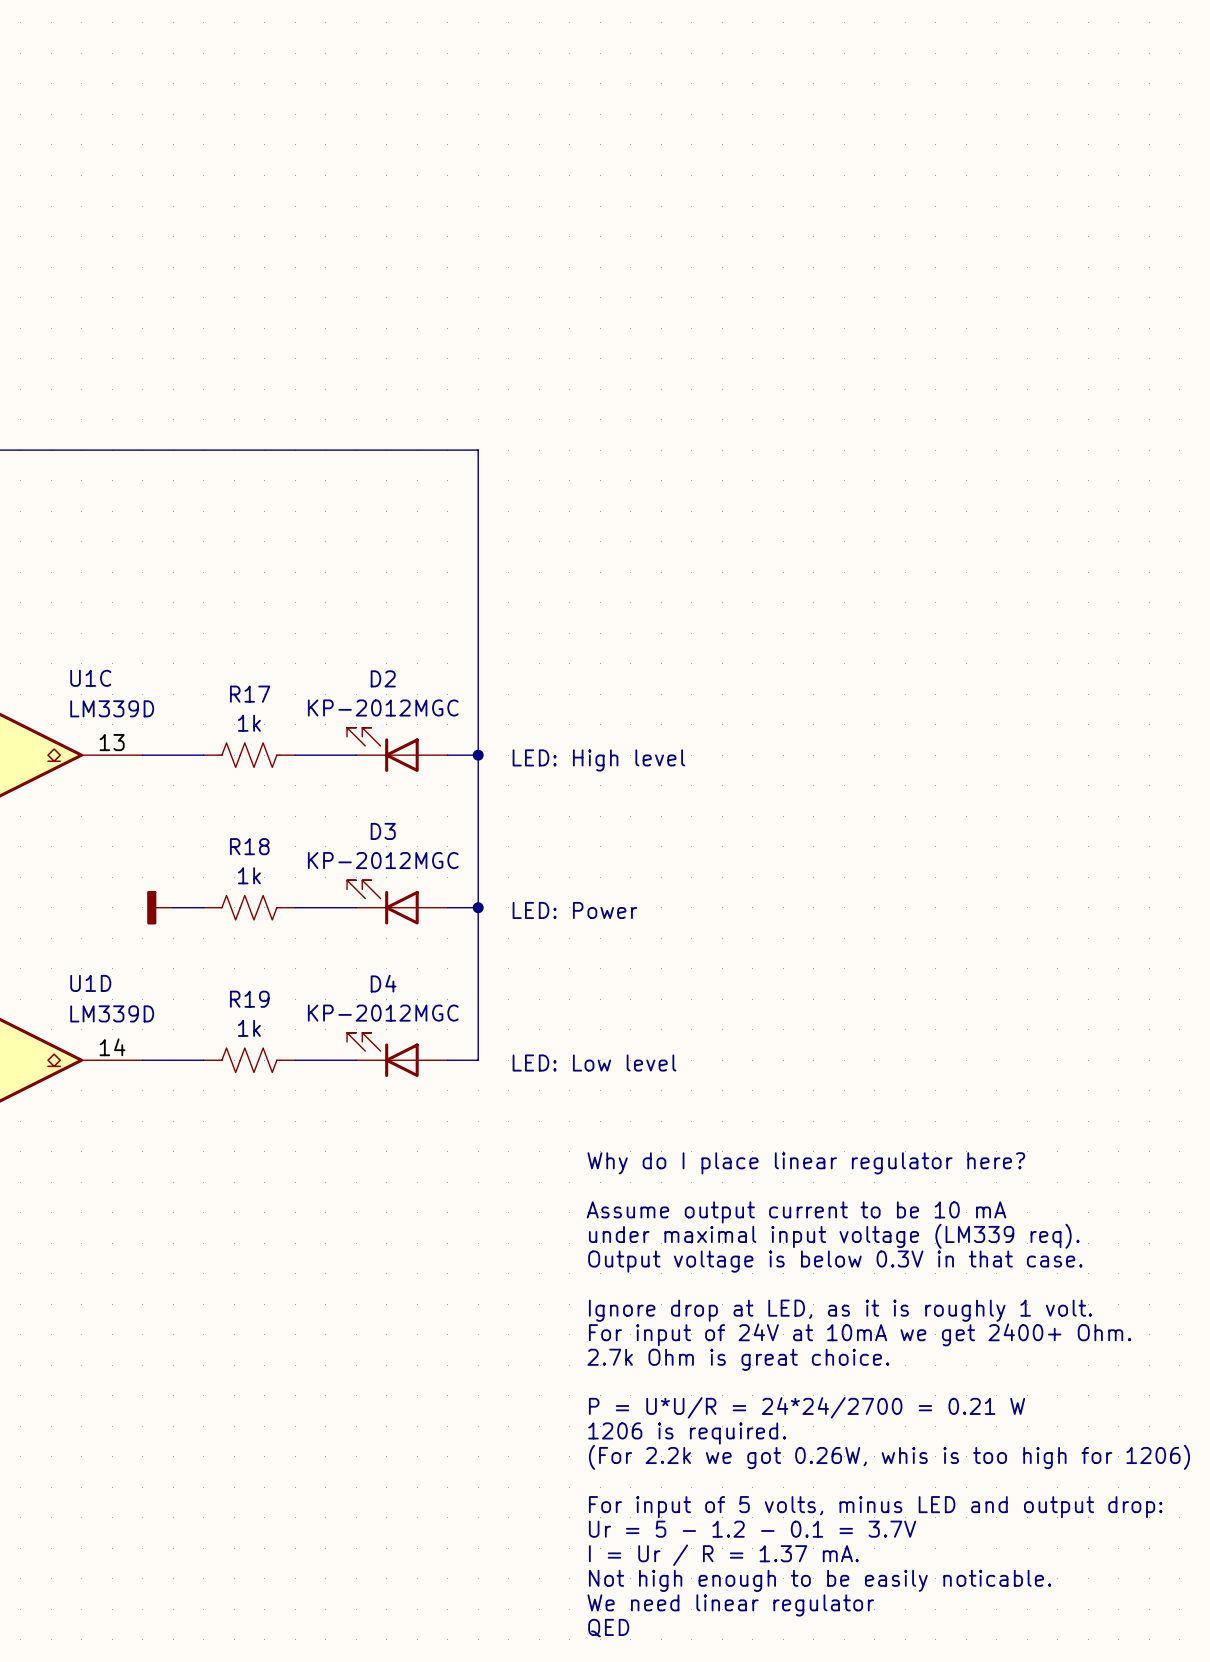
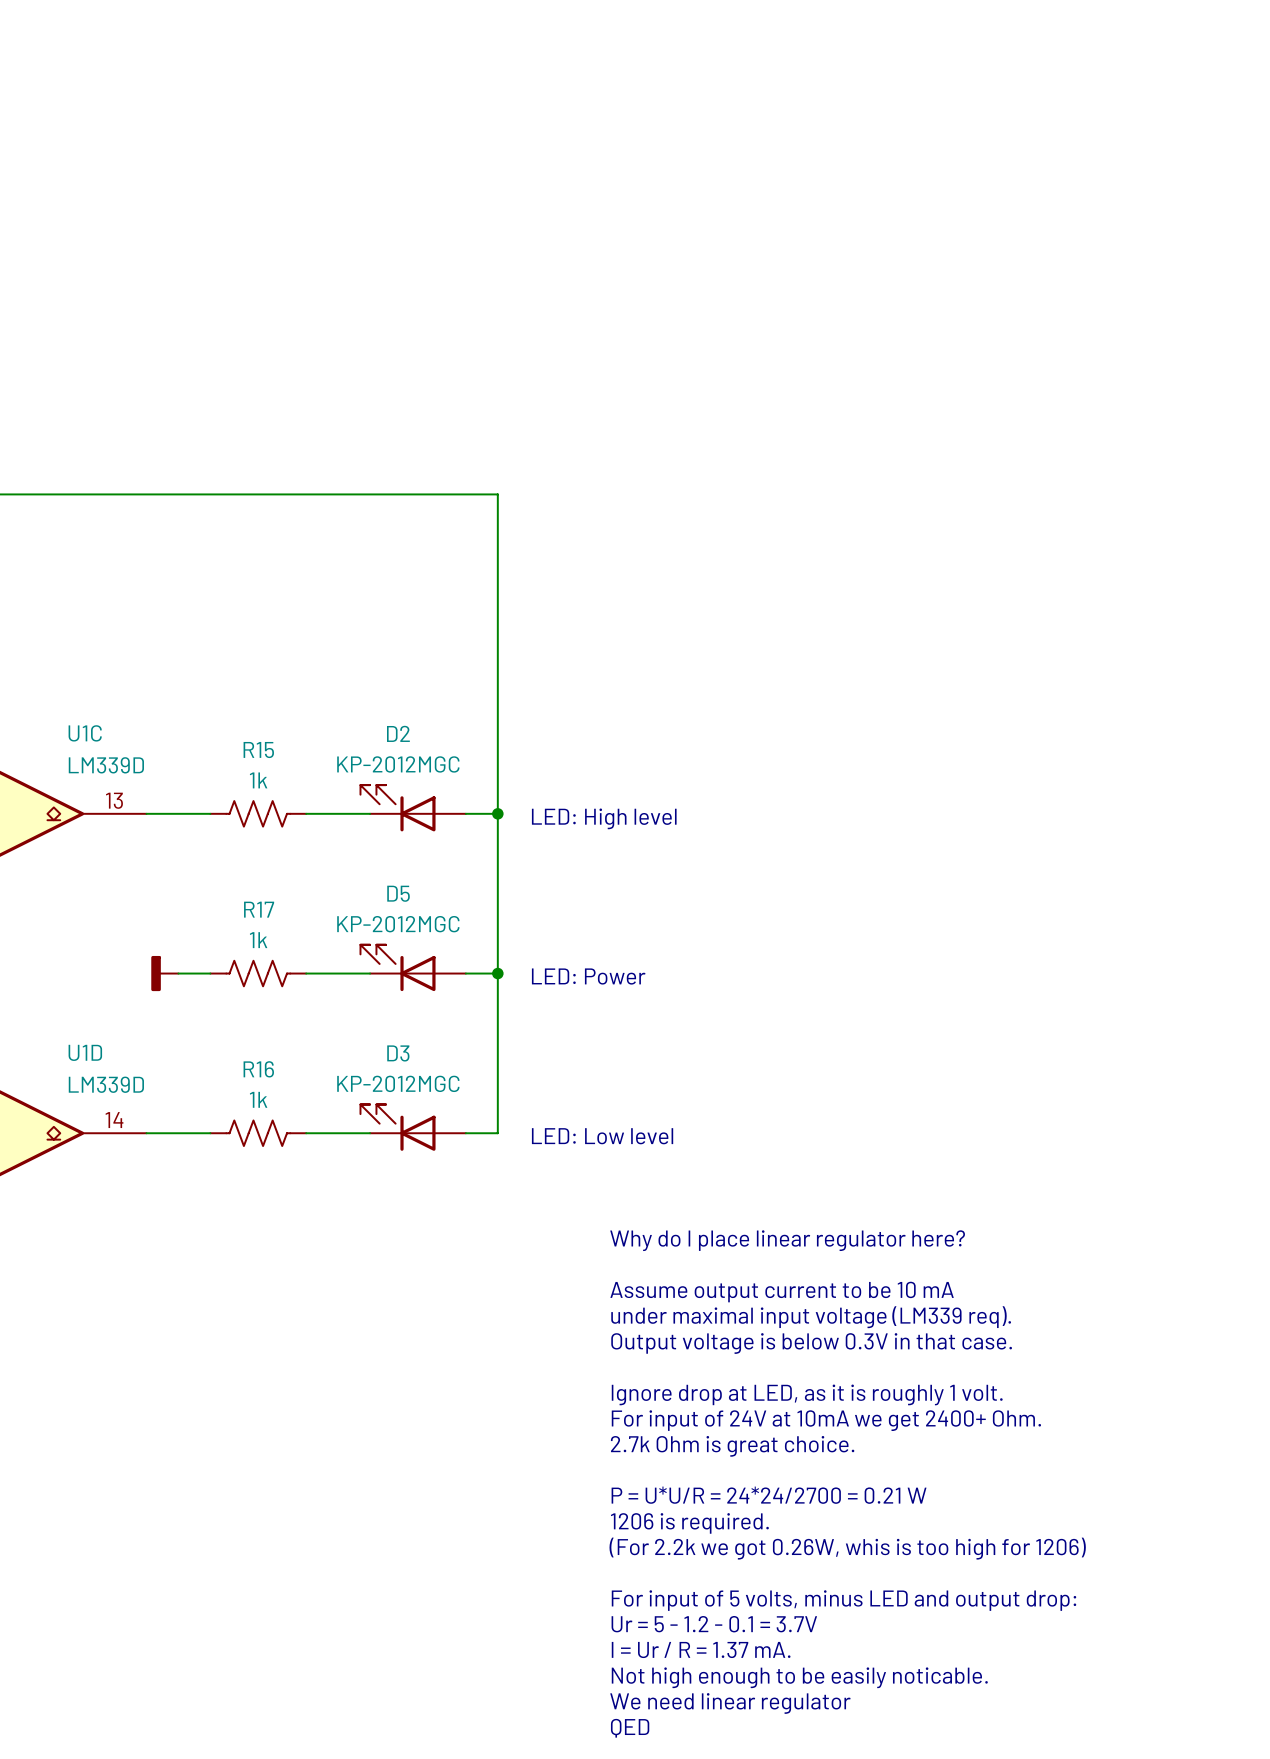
R17 name: R17 (250, 694) -> R15 (258, 750)
D3 name: D3 (383, 831) -> D5 (398, 893)
R18 name: R18 (249, 846) -> R17 (259, 909)
D4 name: D4 (383, 983) -> D3 (398, 1053)
R19 name: R19 (249, 999) -> R16 (258, 1069)

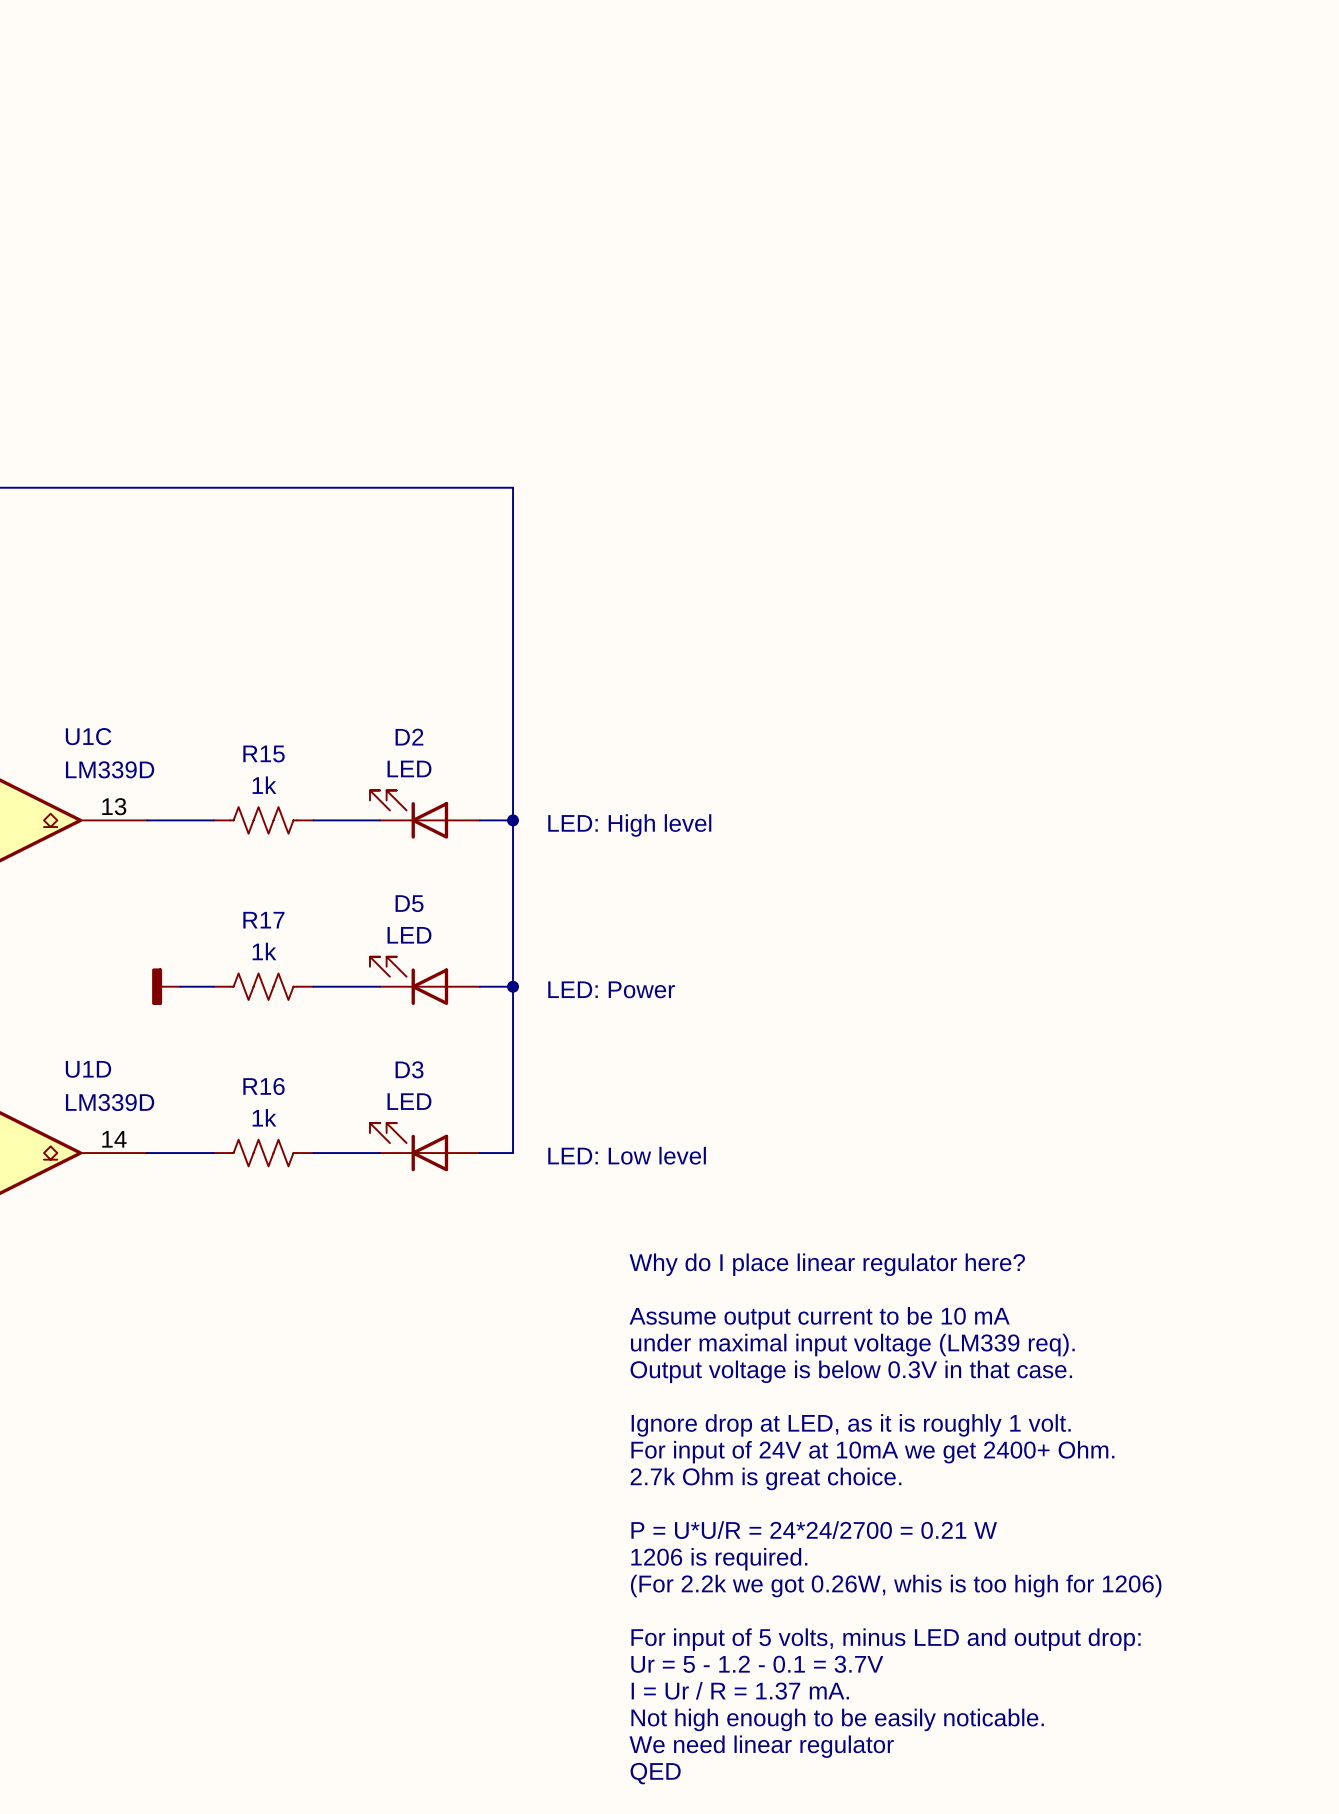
D2 value: KP-2012MGC (398, 764) -> LED (409, 768)
D5 value: KP-2012MGC (398, 924) -> LED (409, 935)
D3 value: KP-2012MGC (398, 1083) -> LED (409, 1101)

